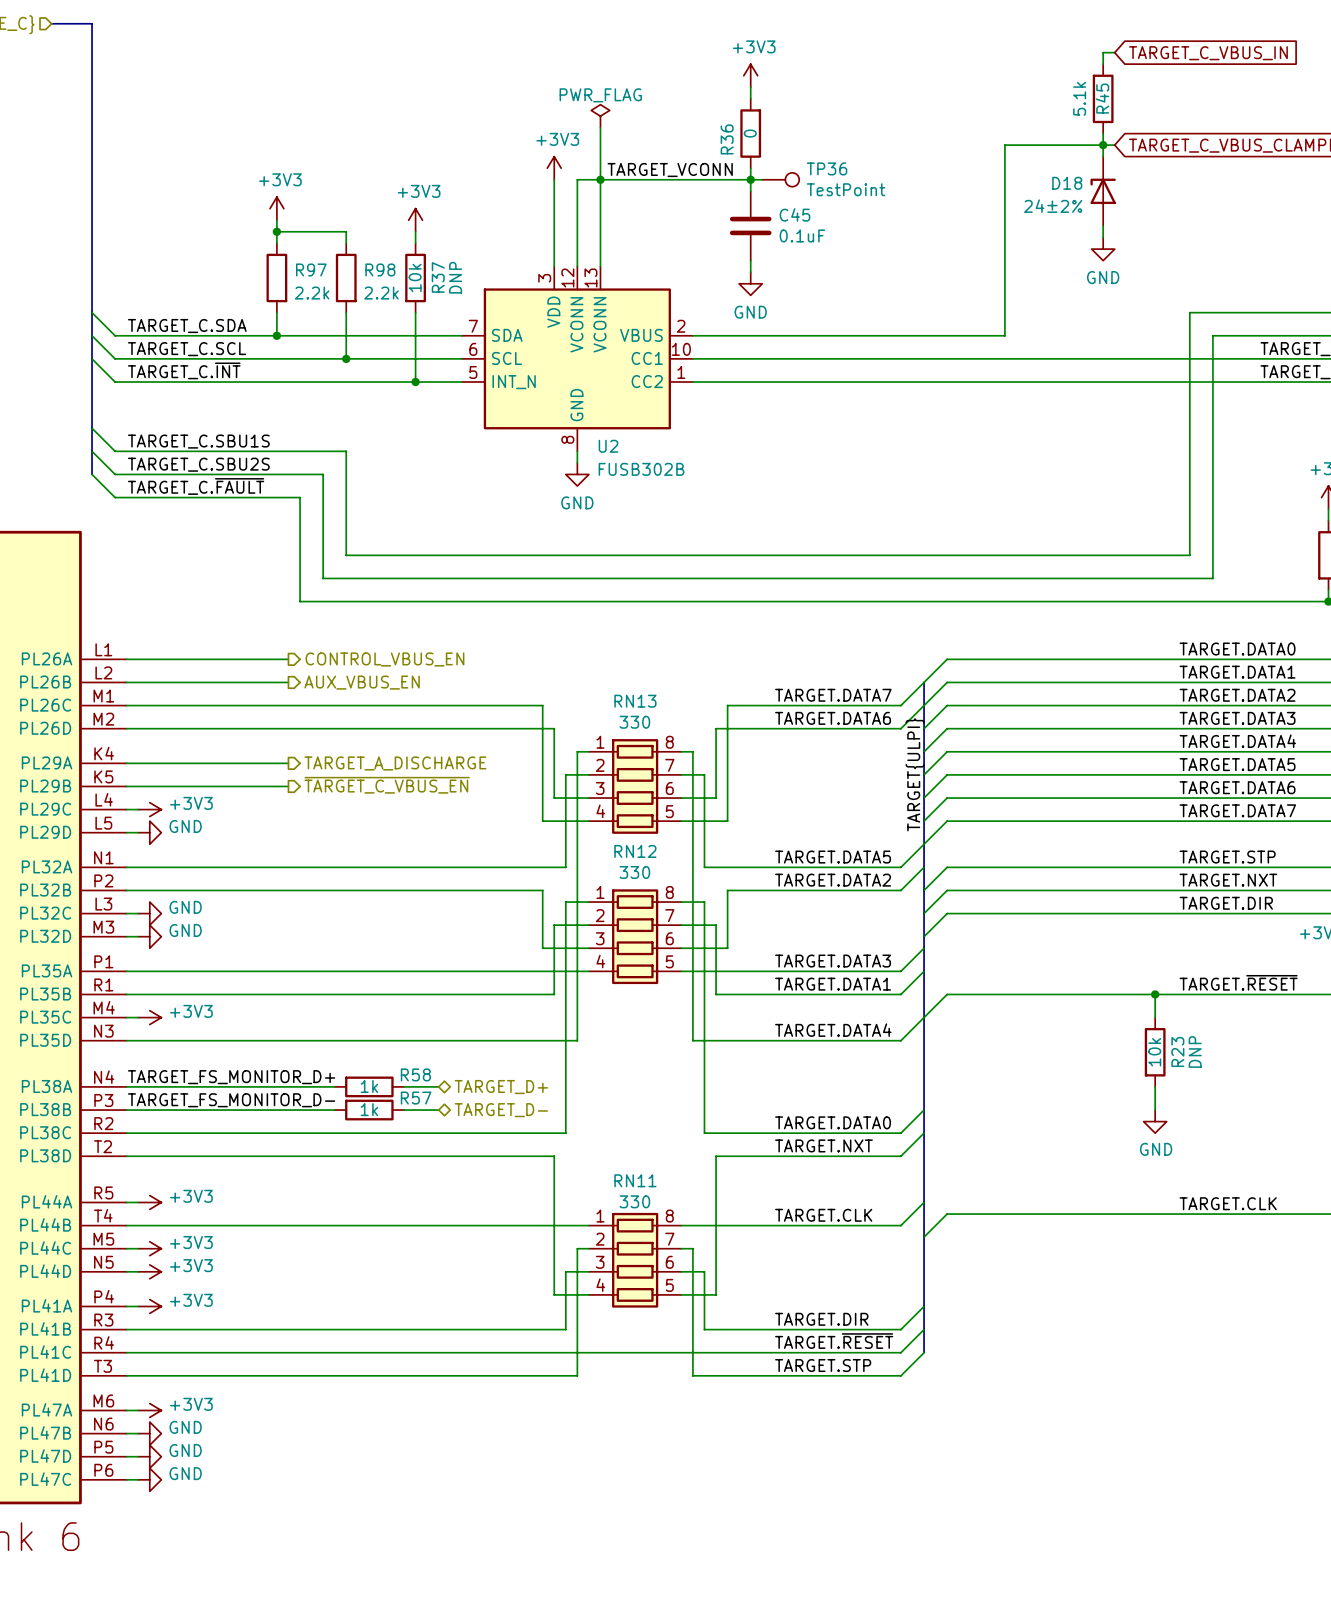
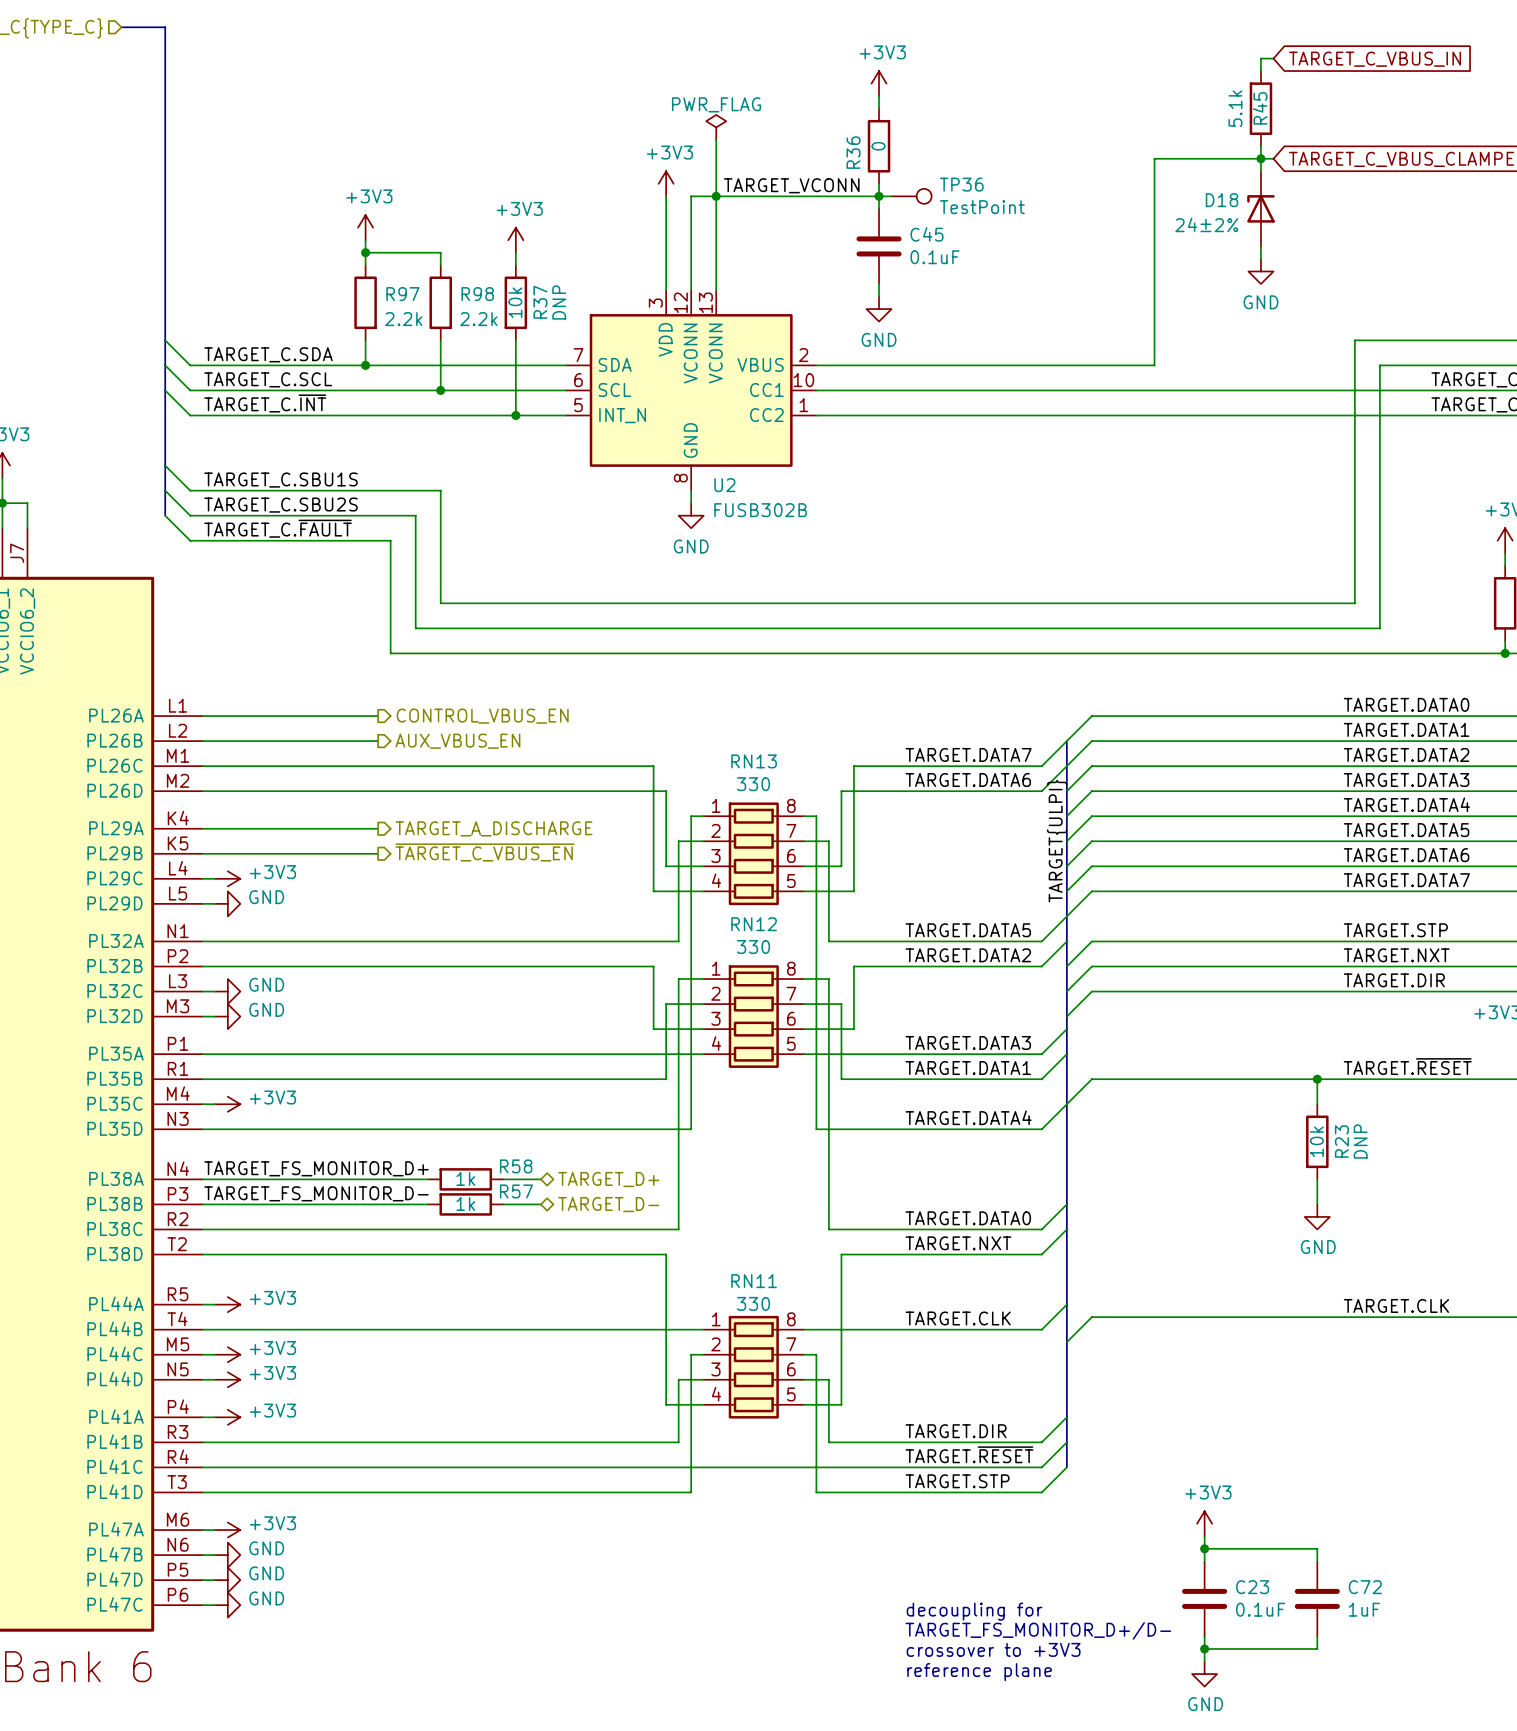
power symbol: none -> +3V3 (1204, 1523)
wire: none -> (1204, 1536) (1204, 1561)
wire: none -> (1204, 1548) (1317, 1548) (1317, 1561)
junction: none -> (1204, 1548)
C23: none -> 0.1uF (1204, 1598)
C72: none -> 1uF (1317, 1598)
text: none -> decoupling for (974, 1611)
text: none -> TARGET_FS_MONITOR_D+/D- (1038, 1630)
wire: none -> (1204, 1636) (1204, 1661)
wire: none -> (1317, 1636) (1317, 1648) (1204, 1648)
junction: none -> (1204, 1648)
text: none -> crossover to +3V3 (993, 1649)
text: none -> reference plane (979, 1672)
power symbol: none -> GND (1204, 1674)

